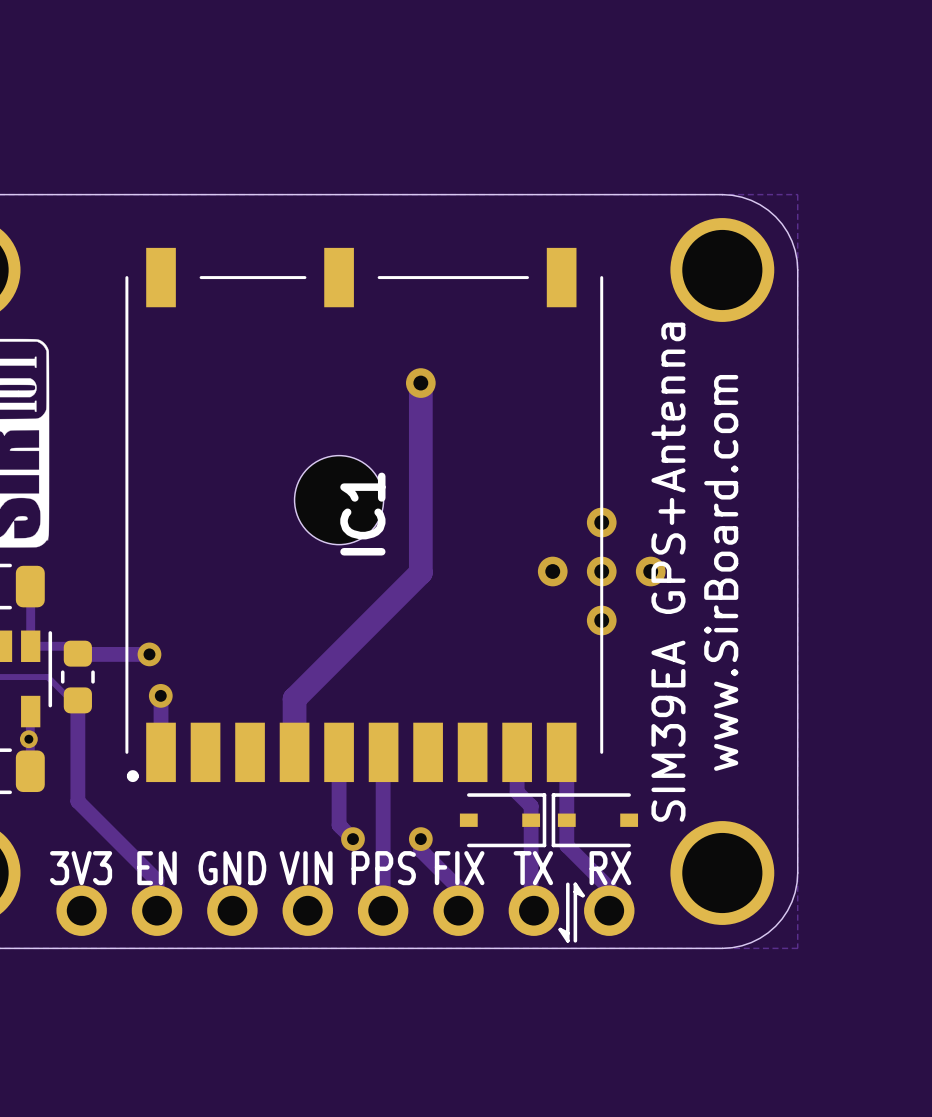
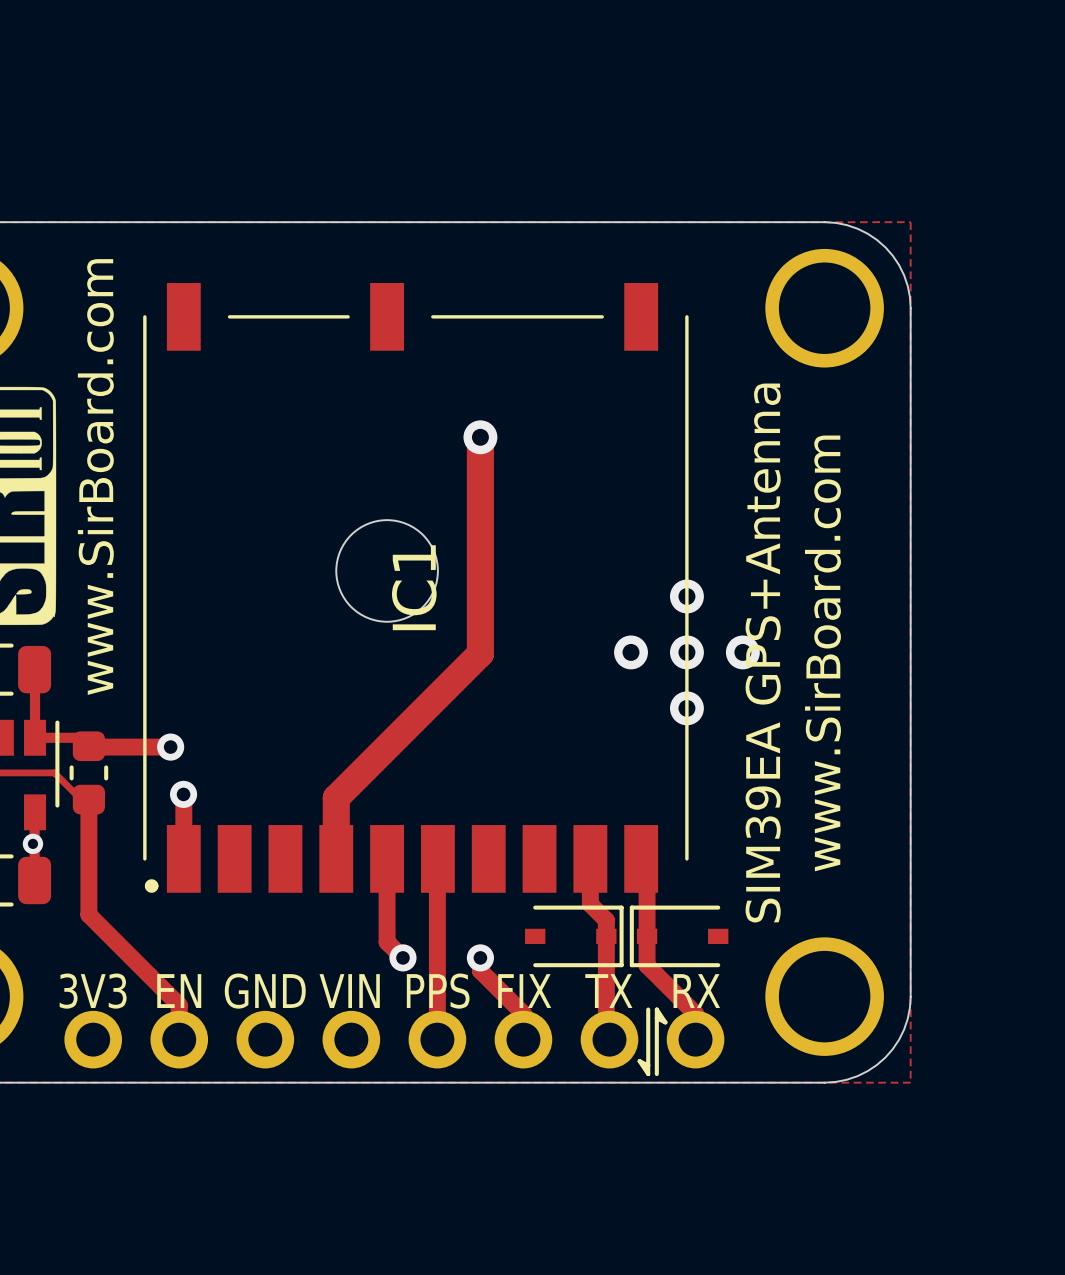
text: none -> www.SirBoard.com (95, 477)

